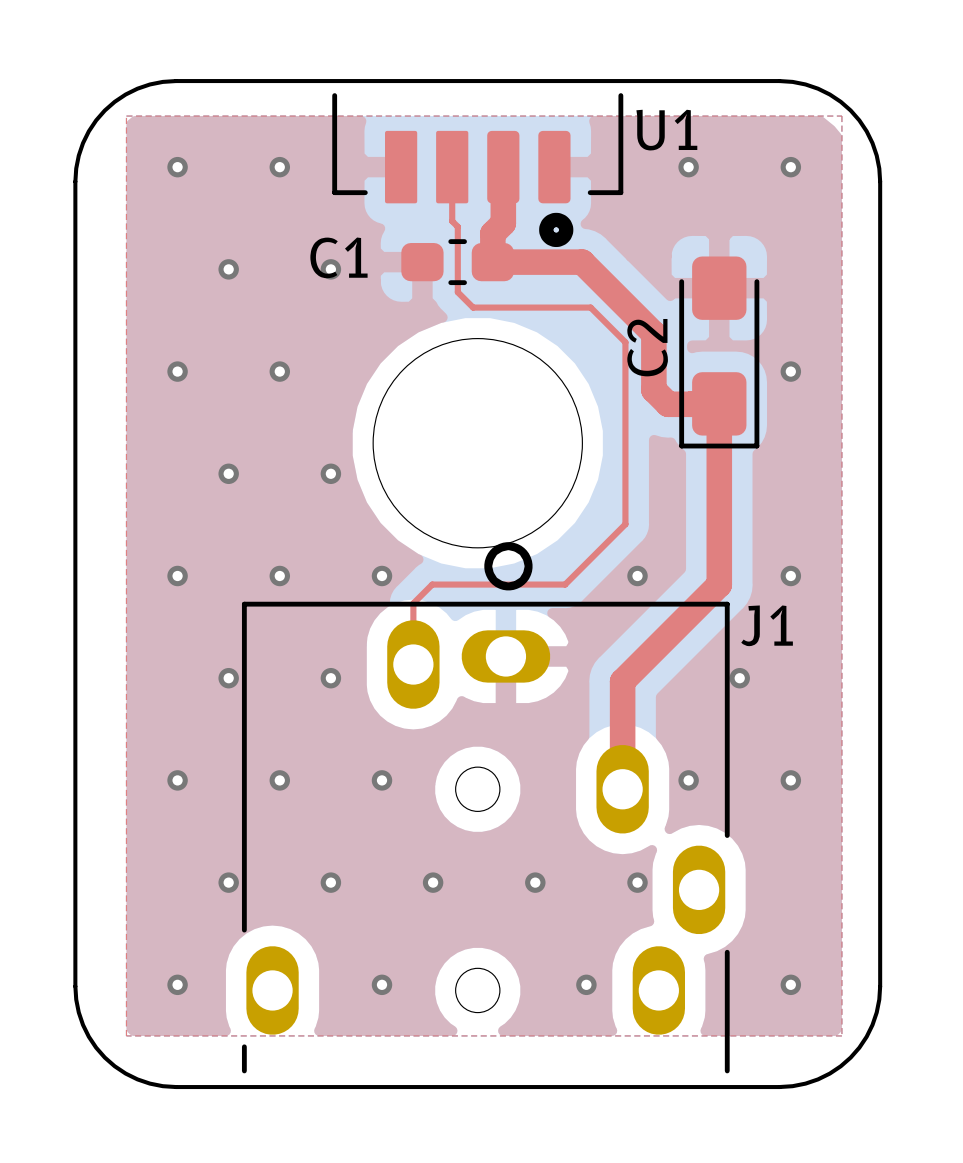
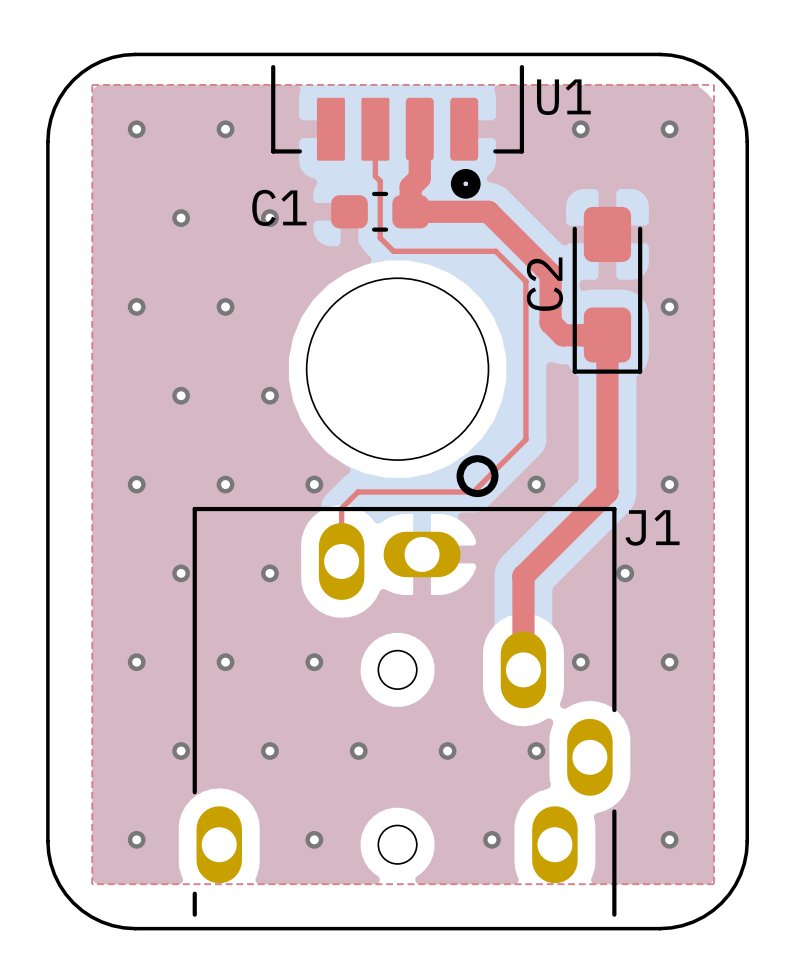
J1 footprint: [241, 542, 730, 1074] -> [192, 455, 617, 917]

